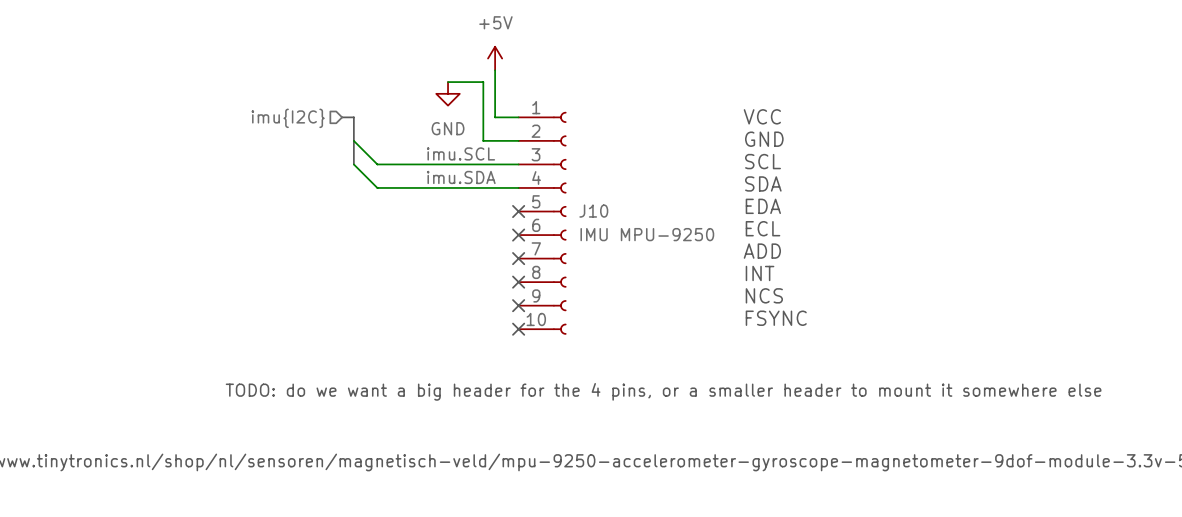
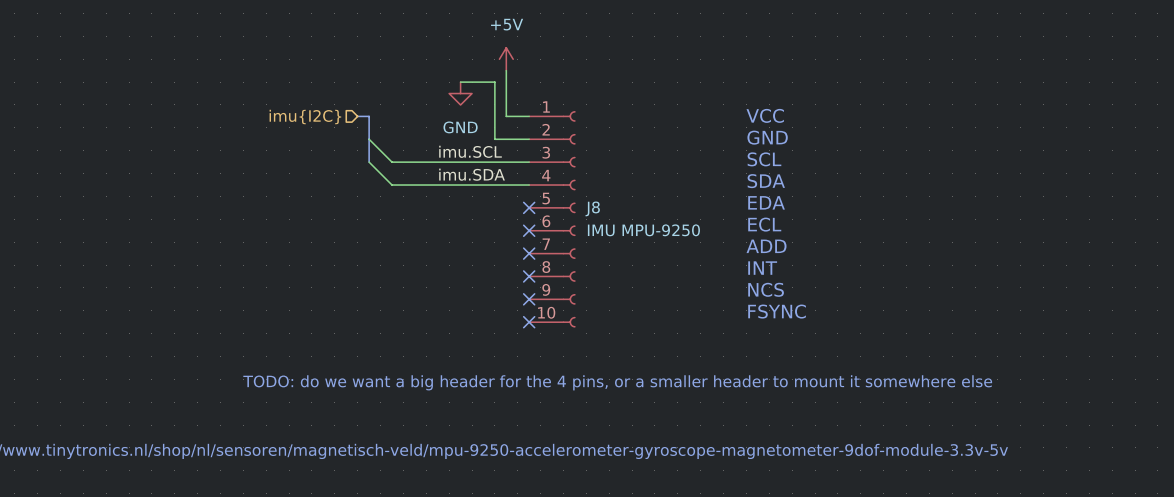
J10 name: J10 (593, 211) -> J8 (592, 208)

